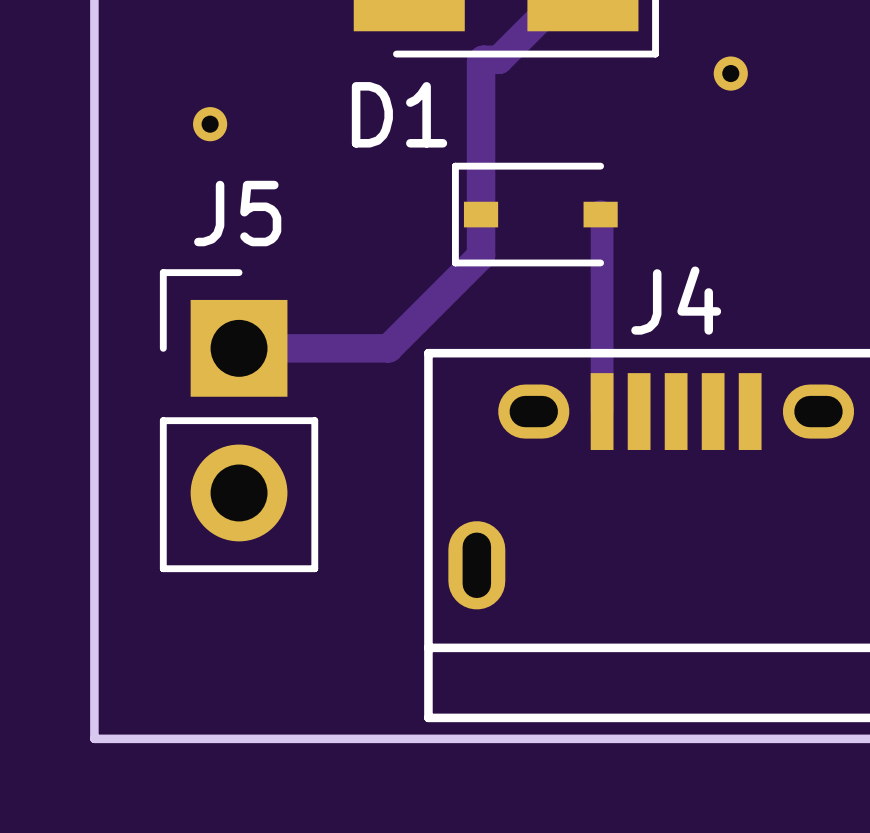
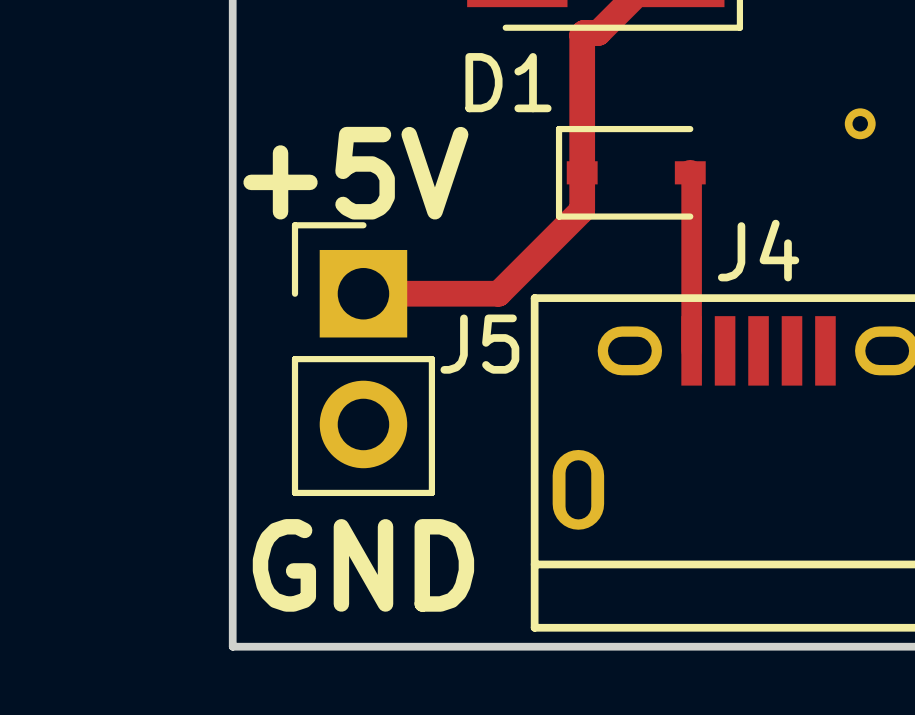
part position: (730, 73) -> (860, 123)
part: (210, 124) -> none
J5 name position: J5 (237, 213) -> J5 (479, 344)
text: none -> +5V (355, 173)
text: none -> GND (363, 565)

